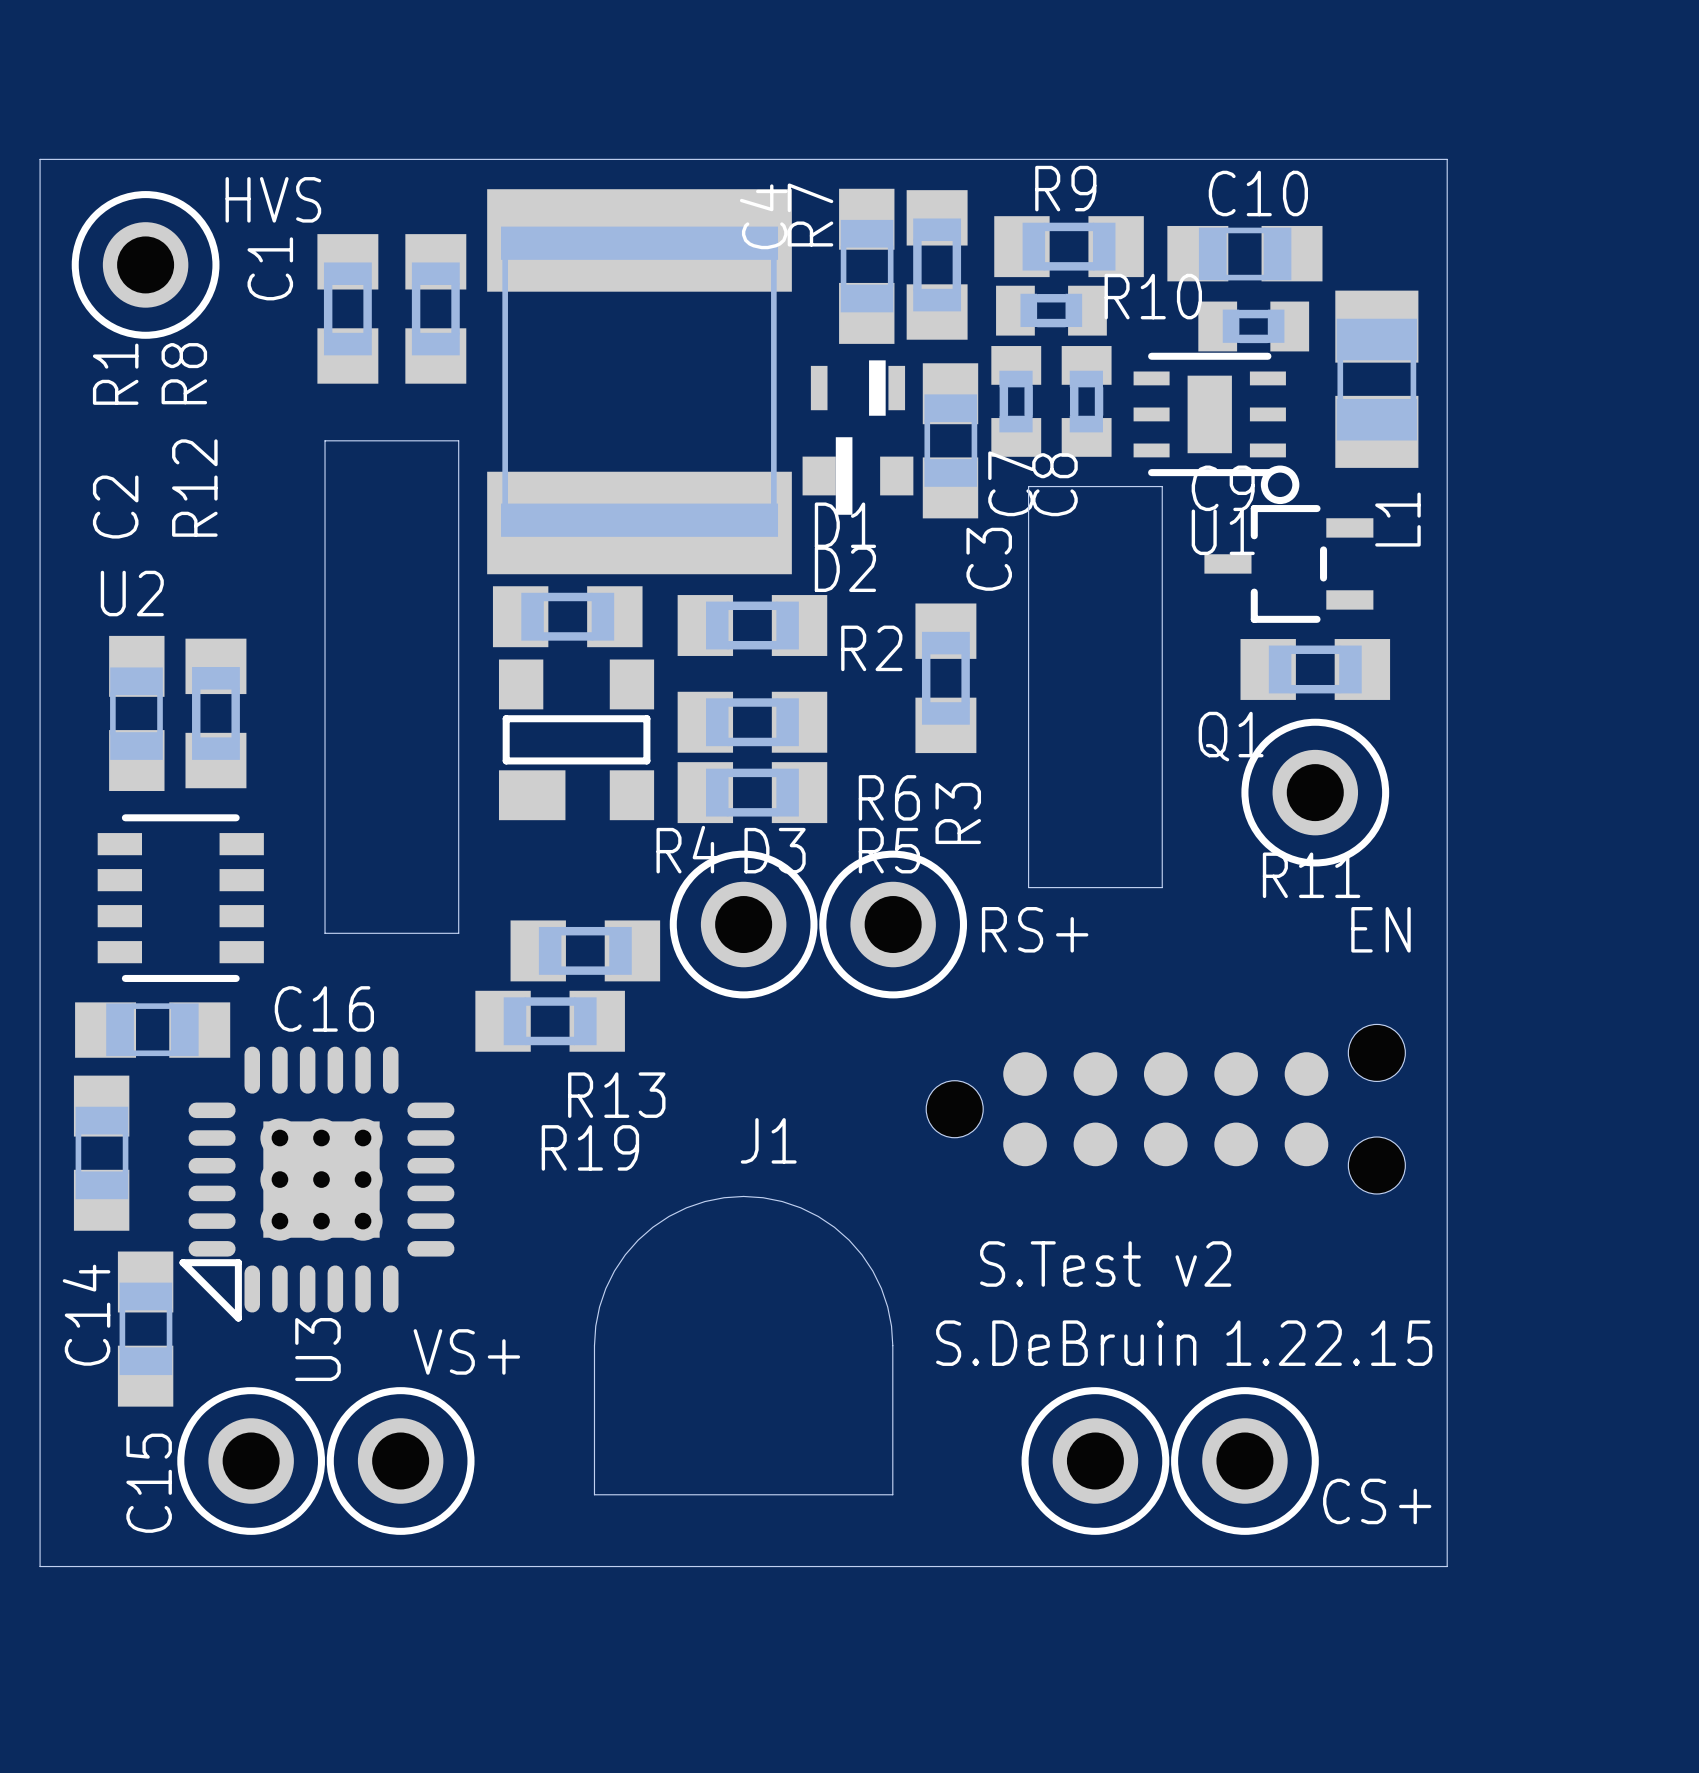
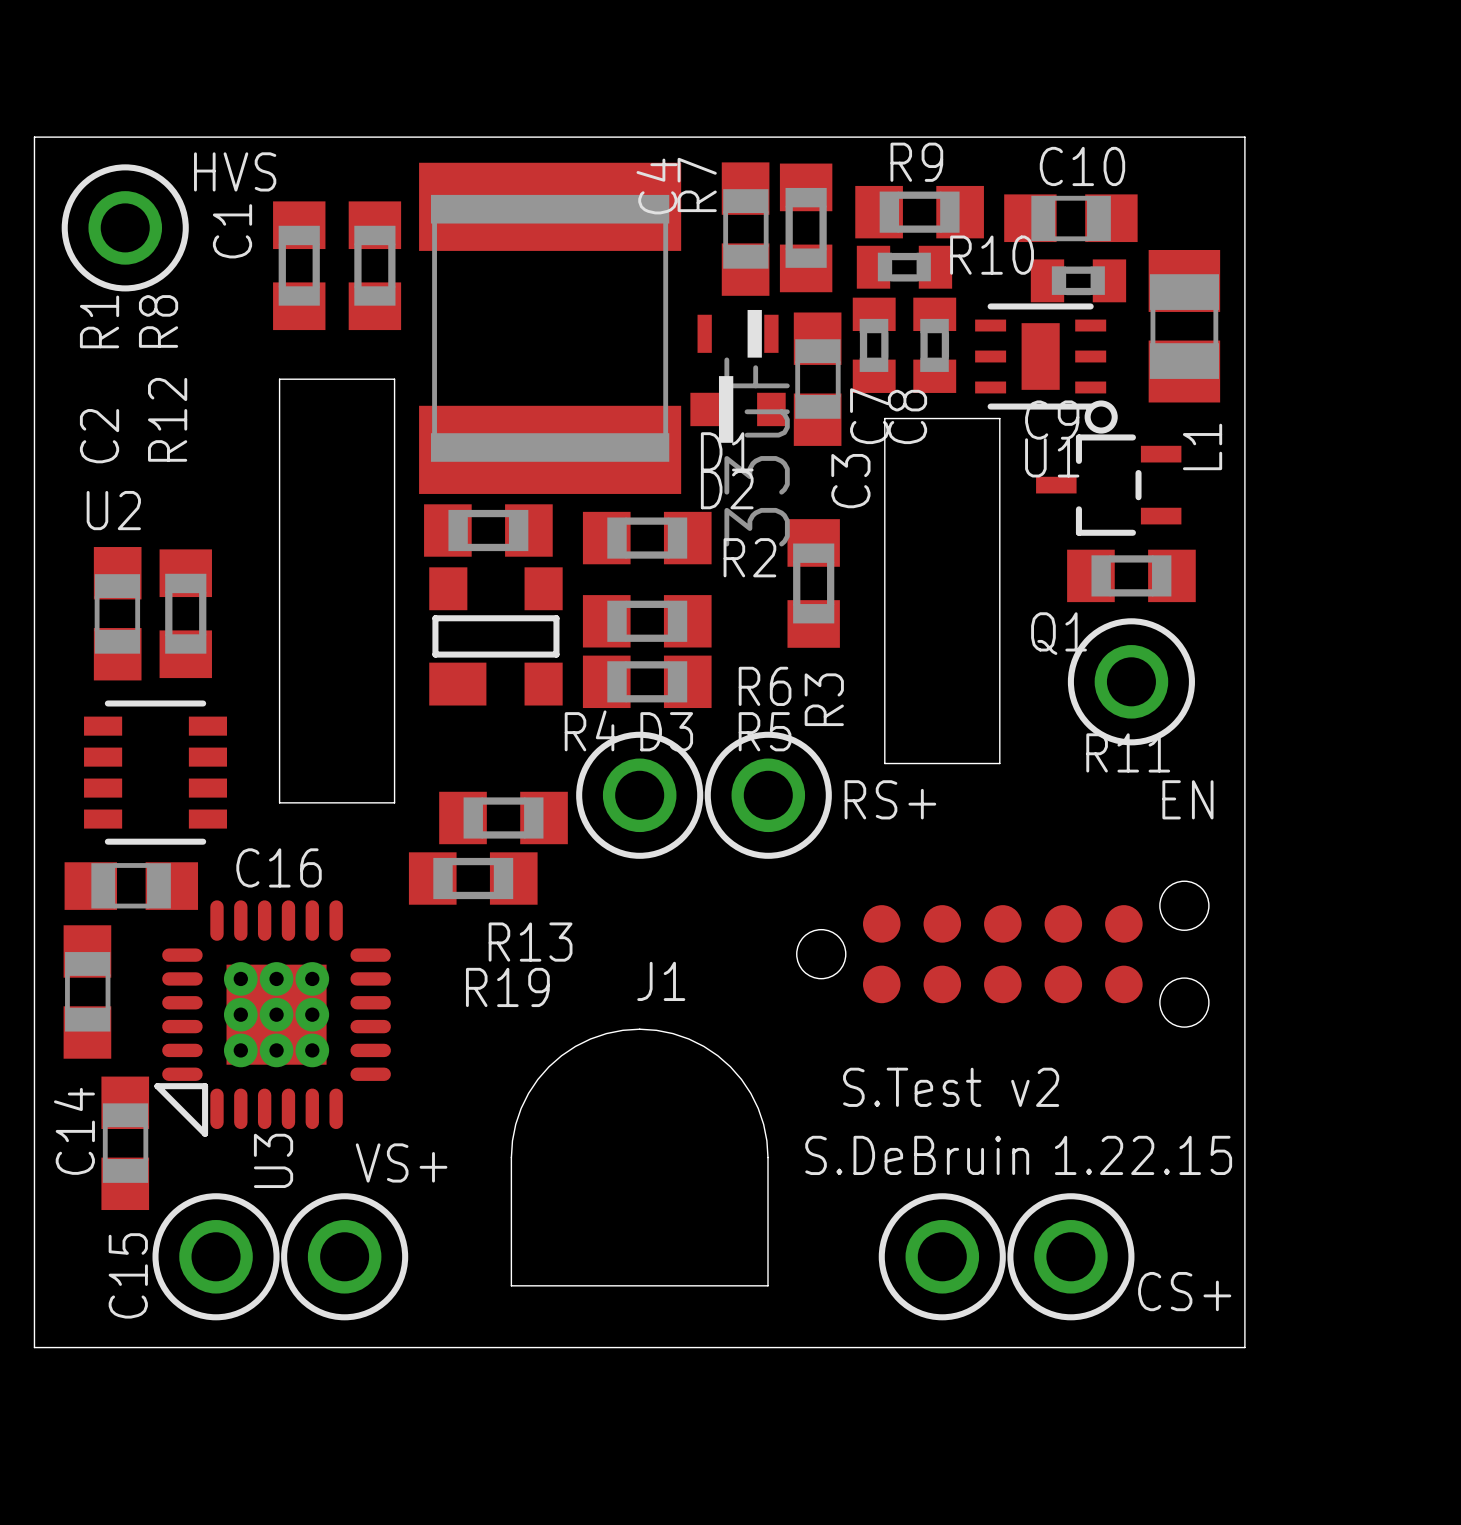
C3 value: none -> 33uF (757, 451)

